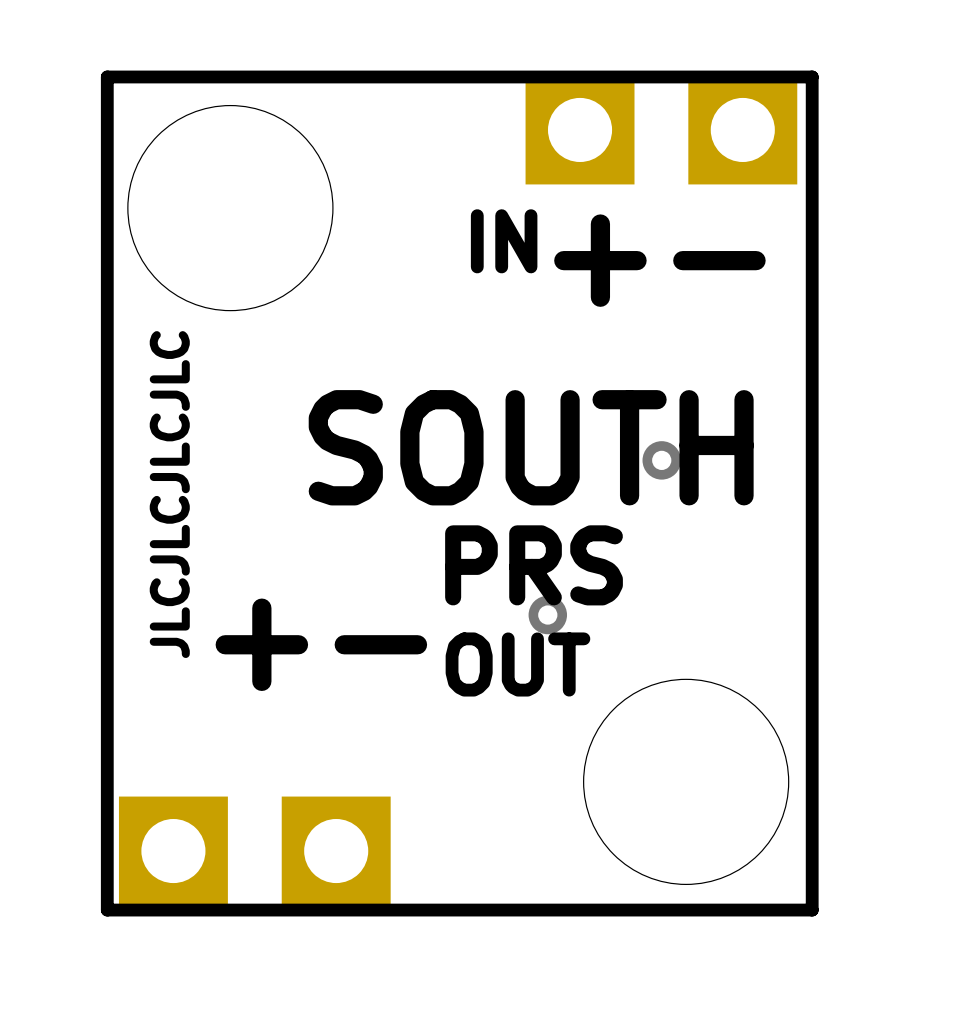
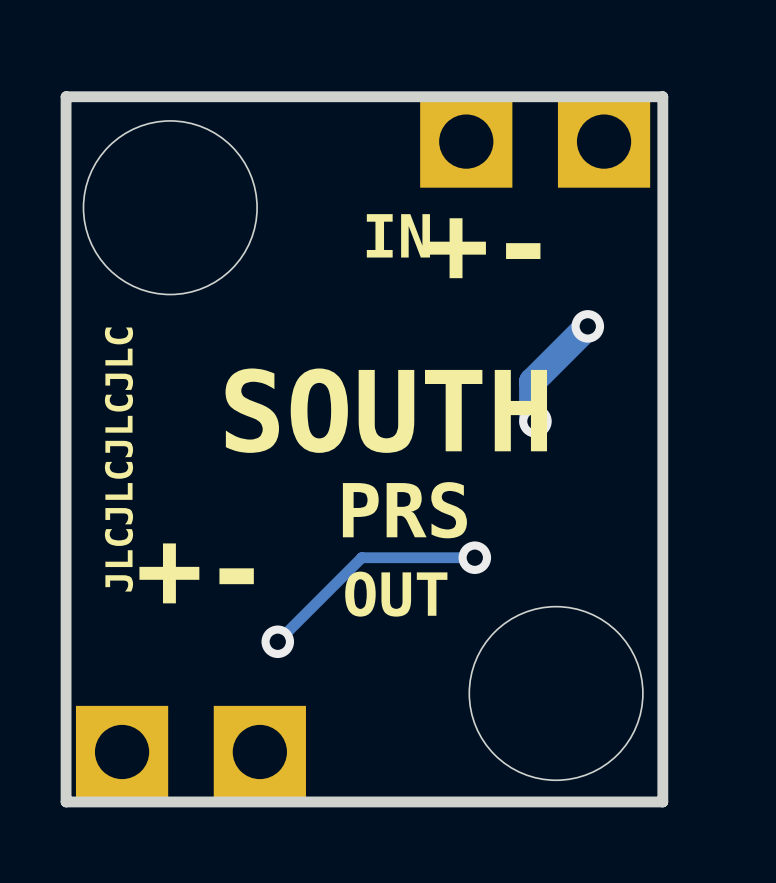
track: none -> (587, 326) (532, 381) (532, 421)
via: none -> (587, 326)
via position: (547, 615) -> (474, 557)
track: none -> (474, 557) (361, 557) (277, 641)
via: none -> (277, 641)

